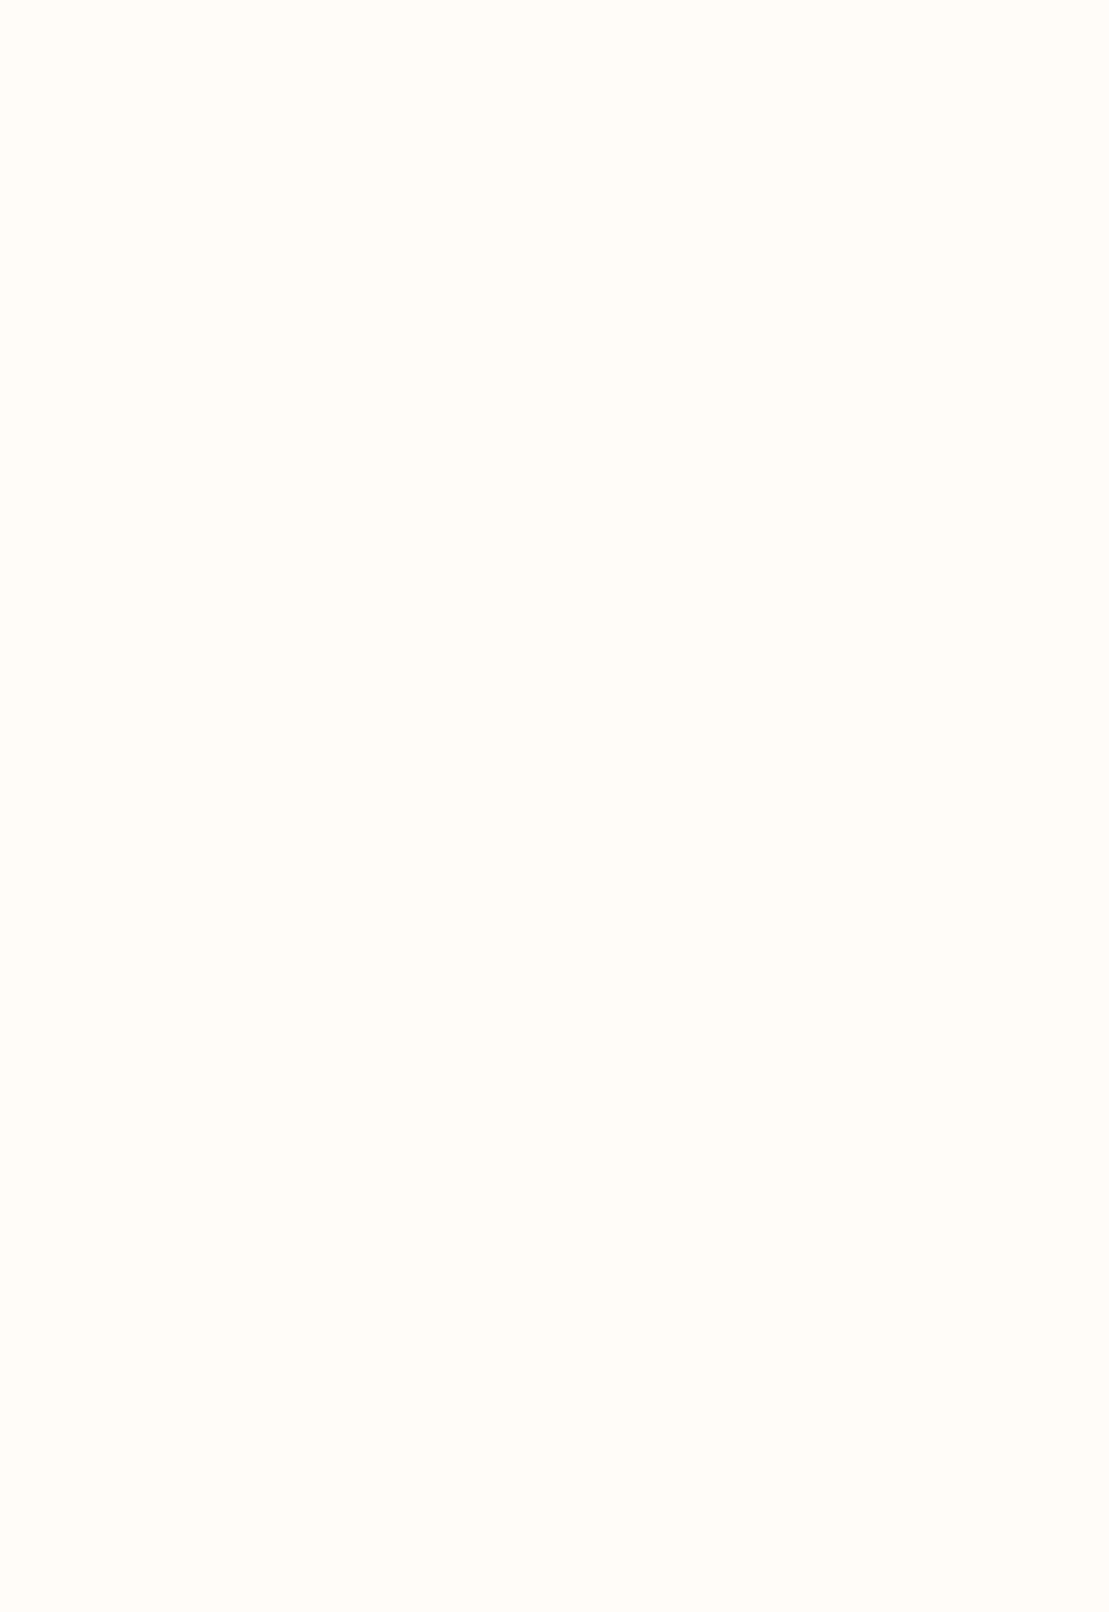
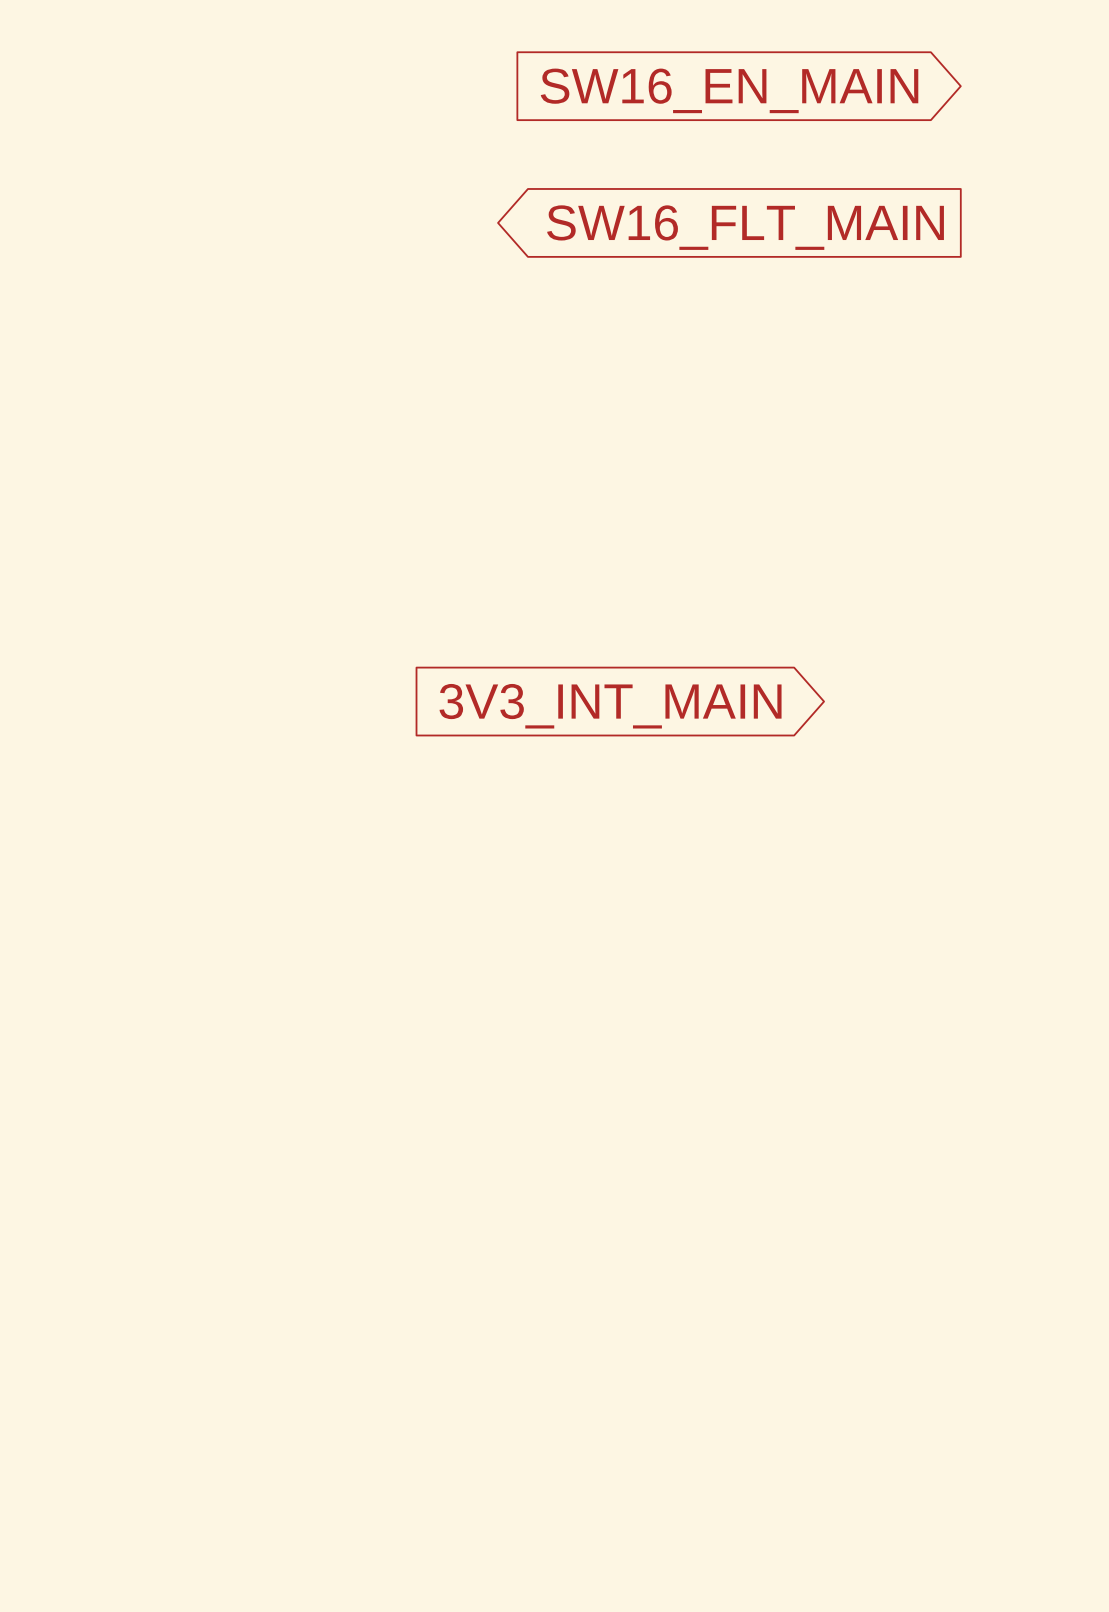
global label: none -> SW16_EN_MAIN (729, 90)
global label: none -> SW16_FLT_MAIN (745, 227)
global label: none -> 3V3_INT_MAIN (610, 706)

